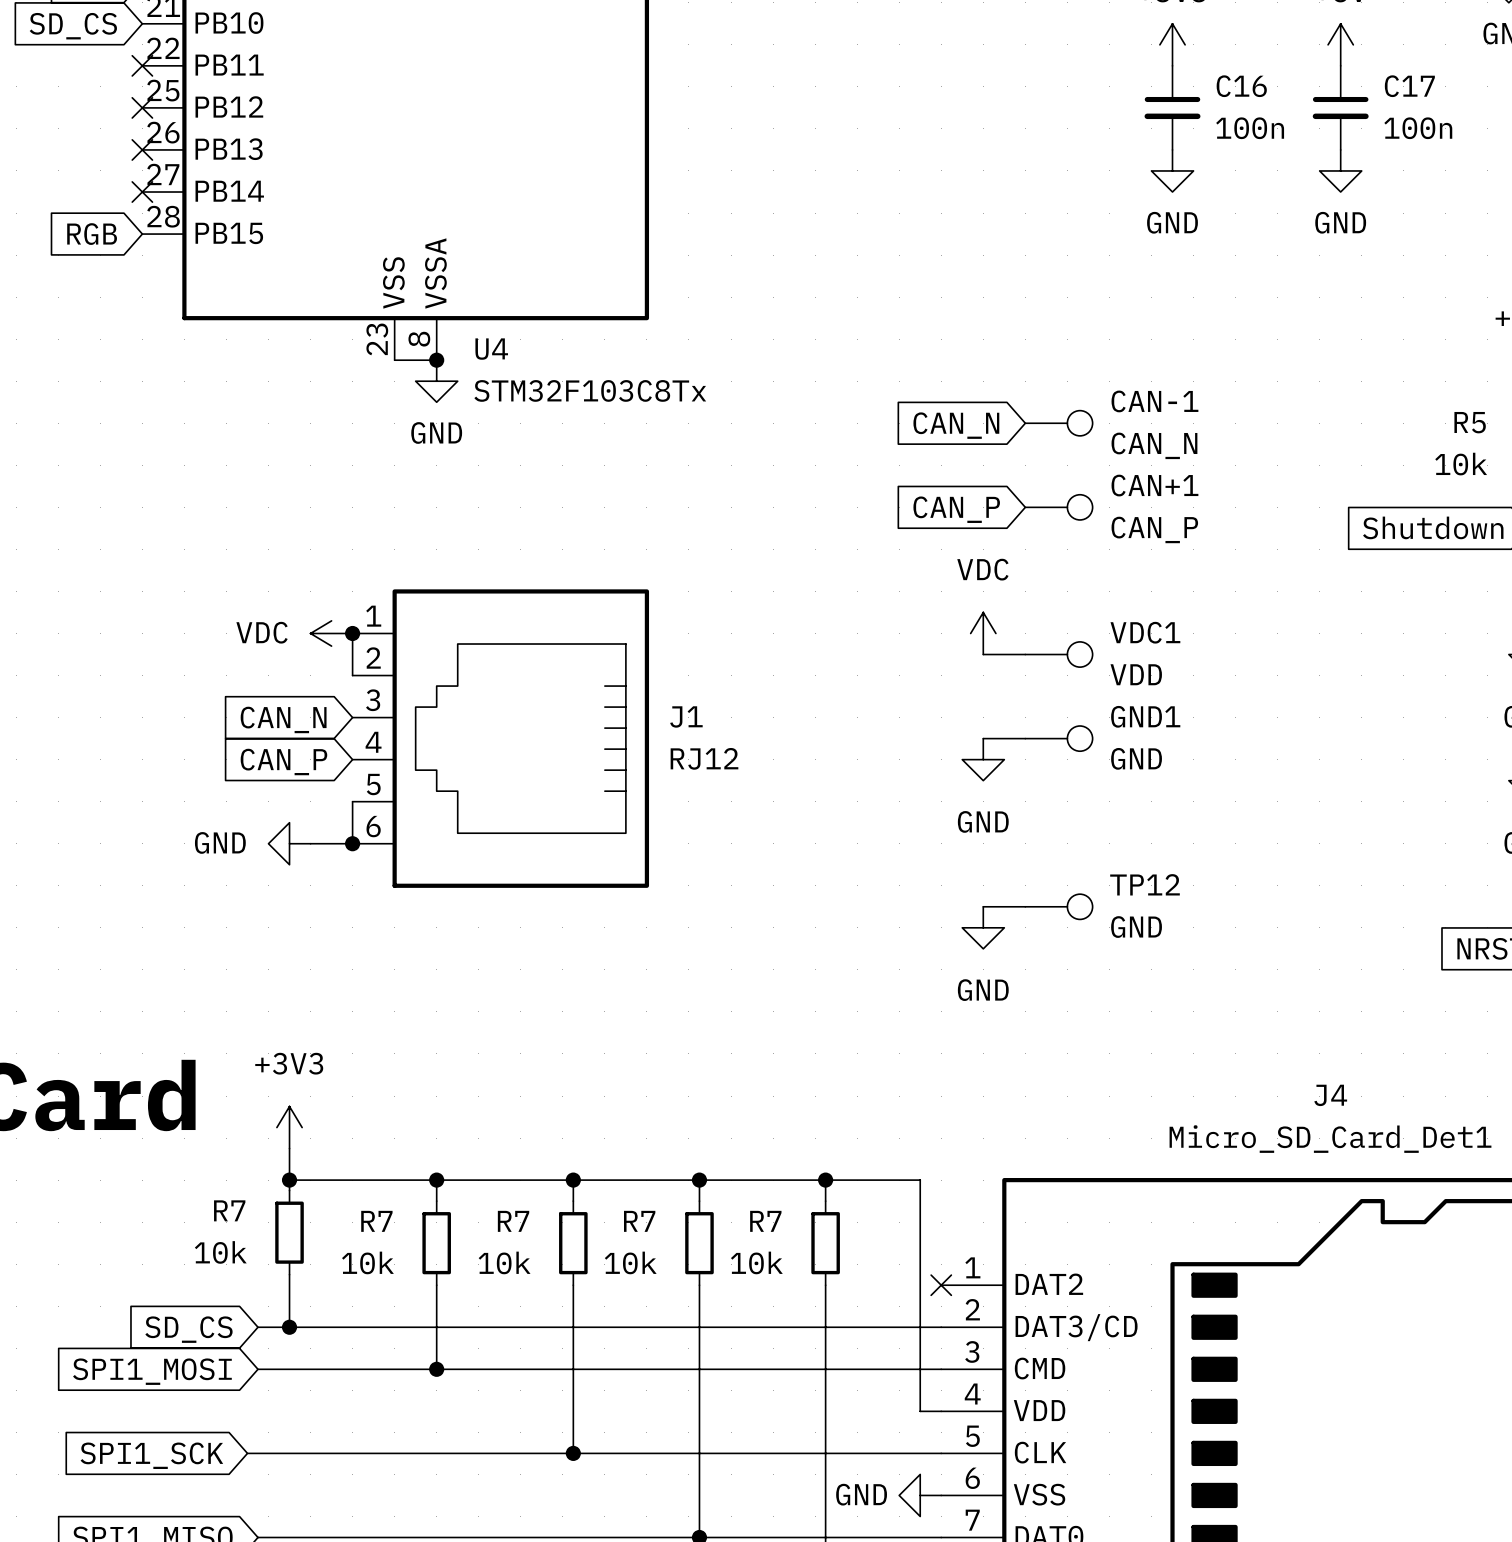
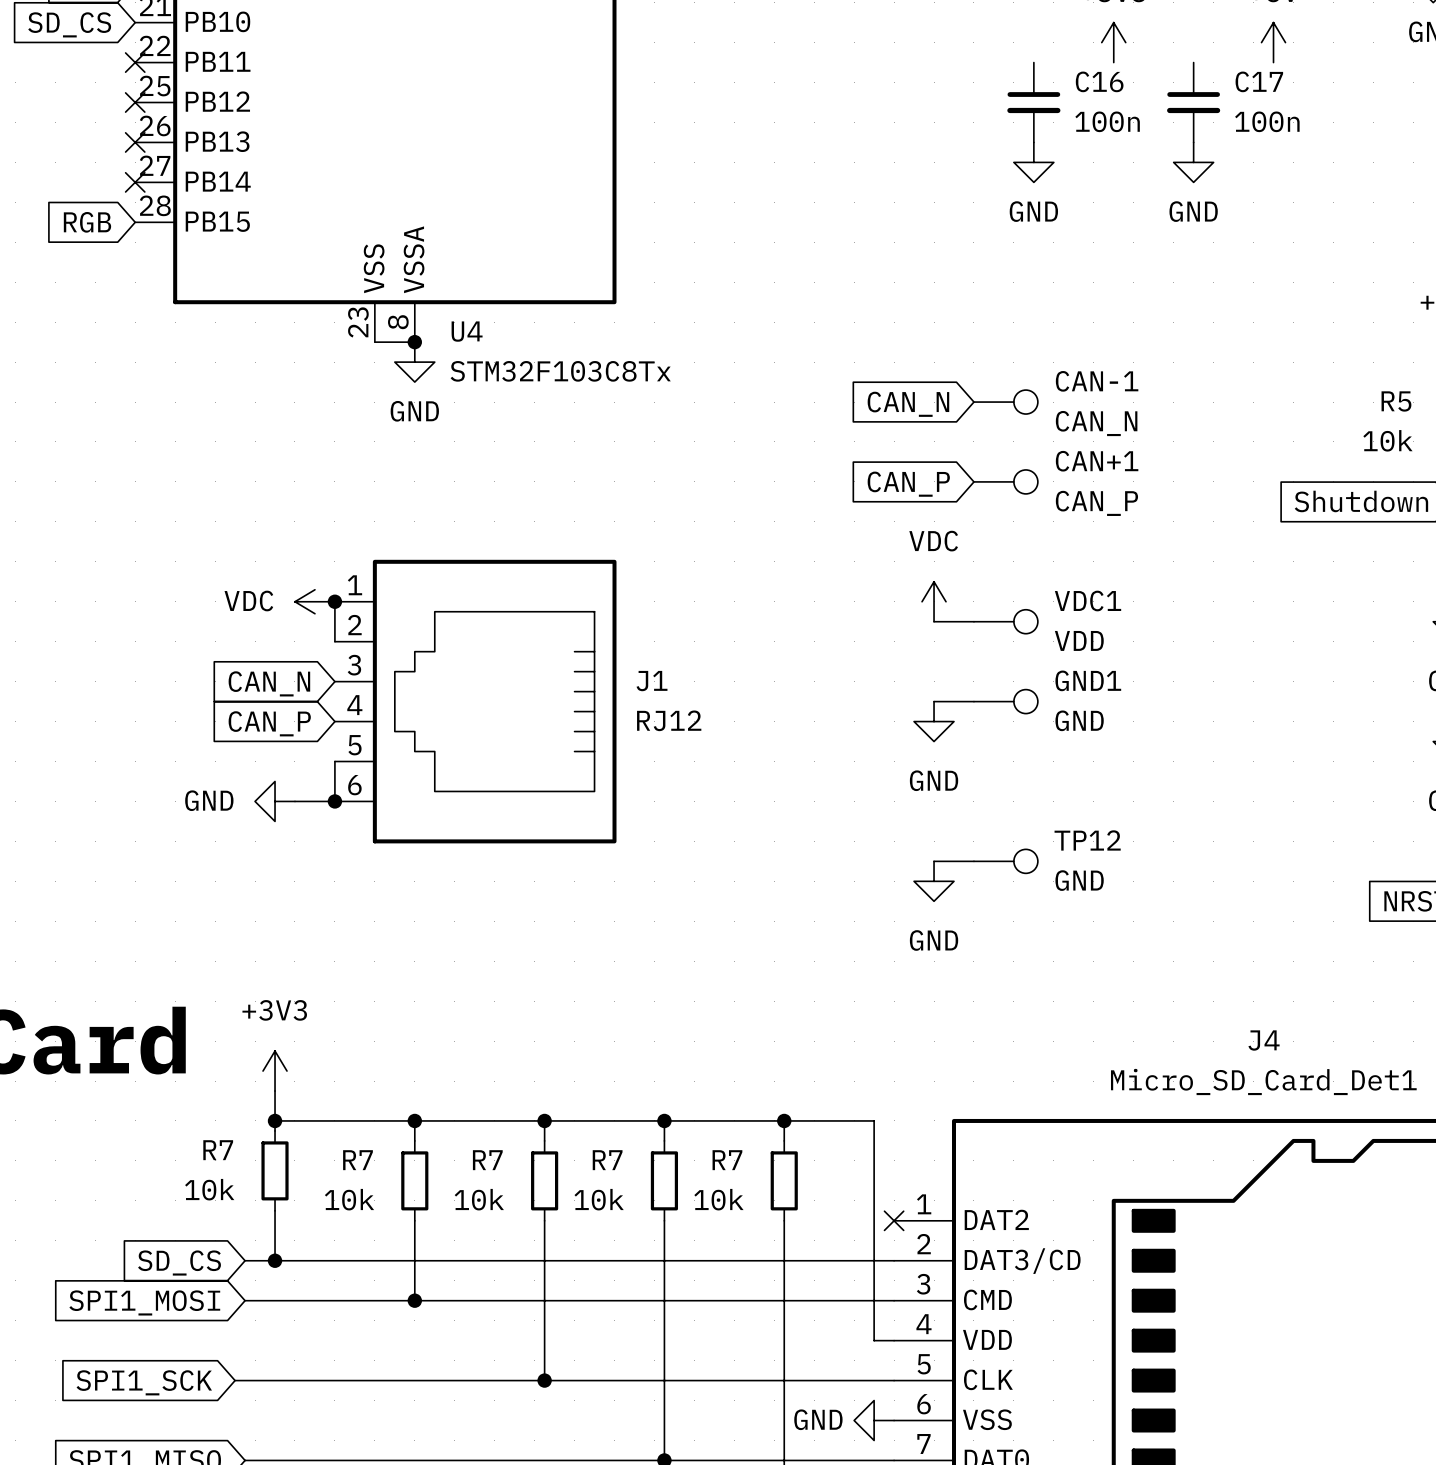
C16 position: (1172, 107) -> (1033, 102)
C17 position: (1340, 107) -> (1193, 102)
power symbol: none -> GND (1033, 162)
power symbol: GND (1172, 170) -> none
power symbol: none -> GND (1193, 162)
power symbol: GND (1340, 170) -> none

